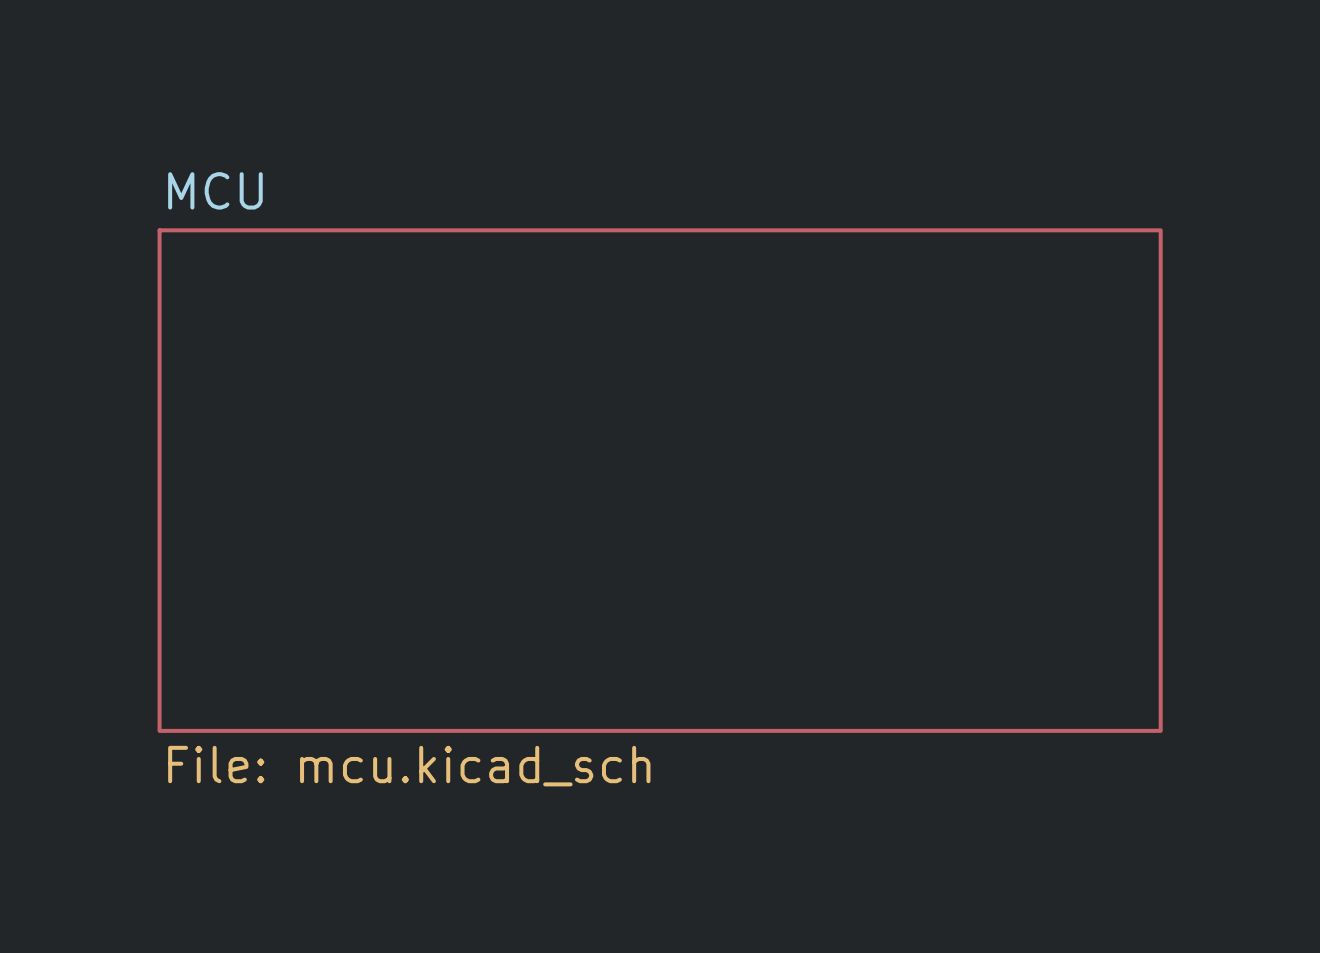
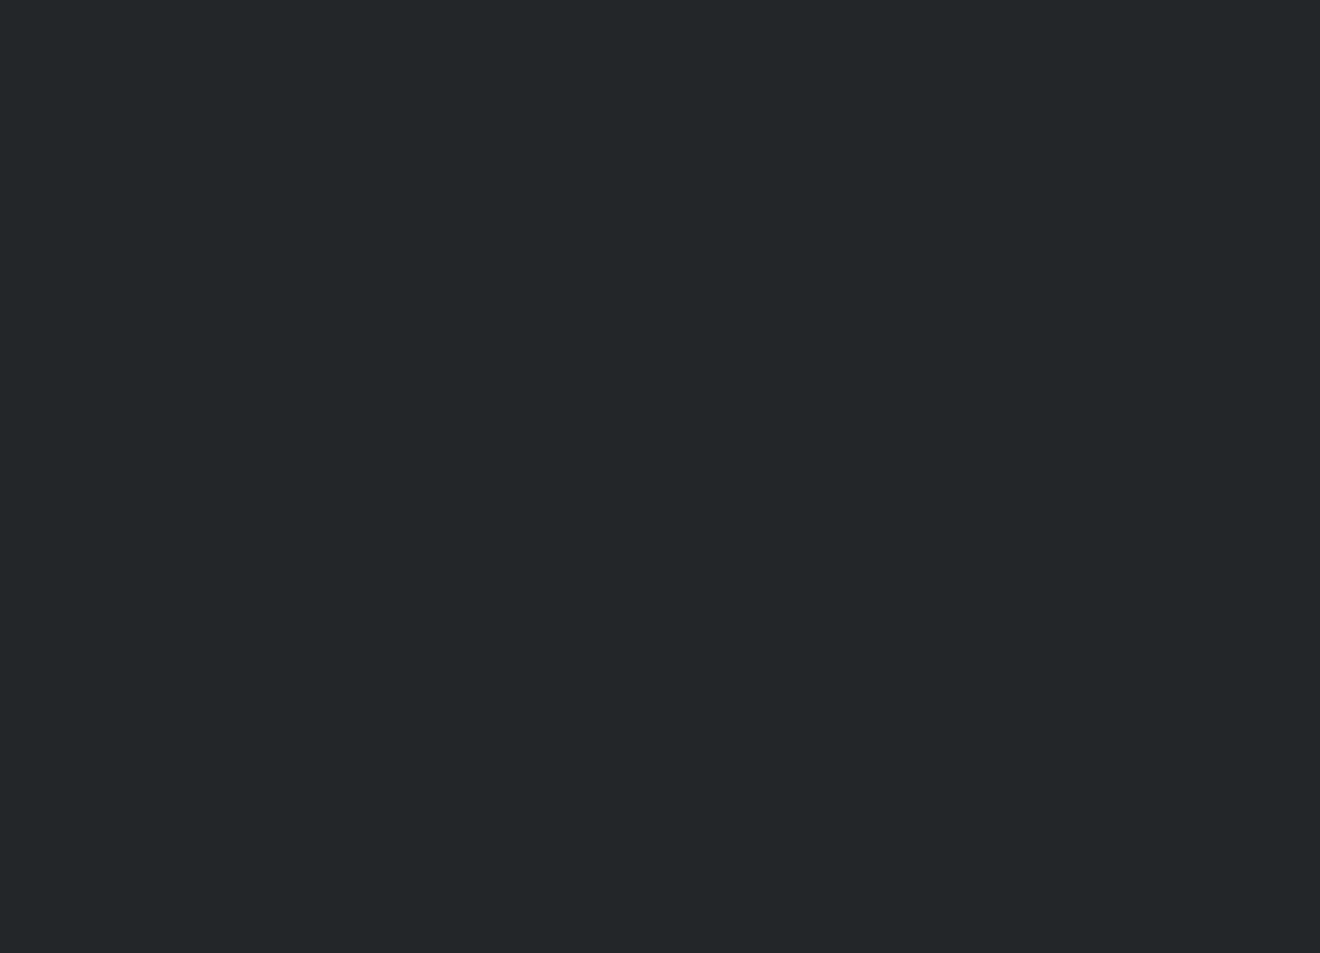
sheet MCU: File: mcu.kicad_sch (660, 480) -> none

